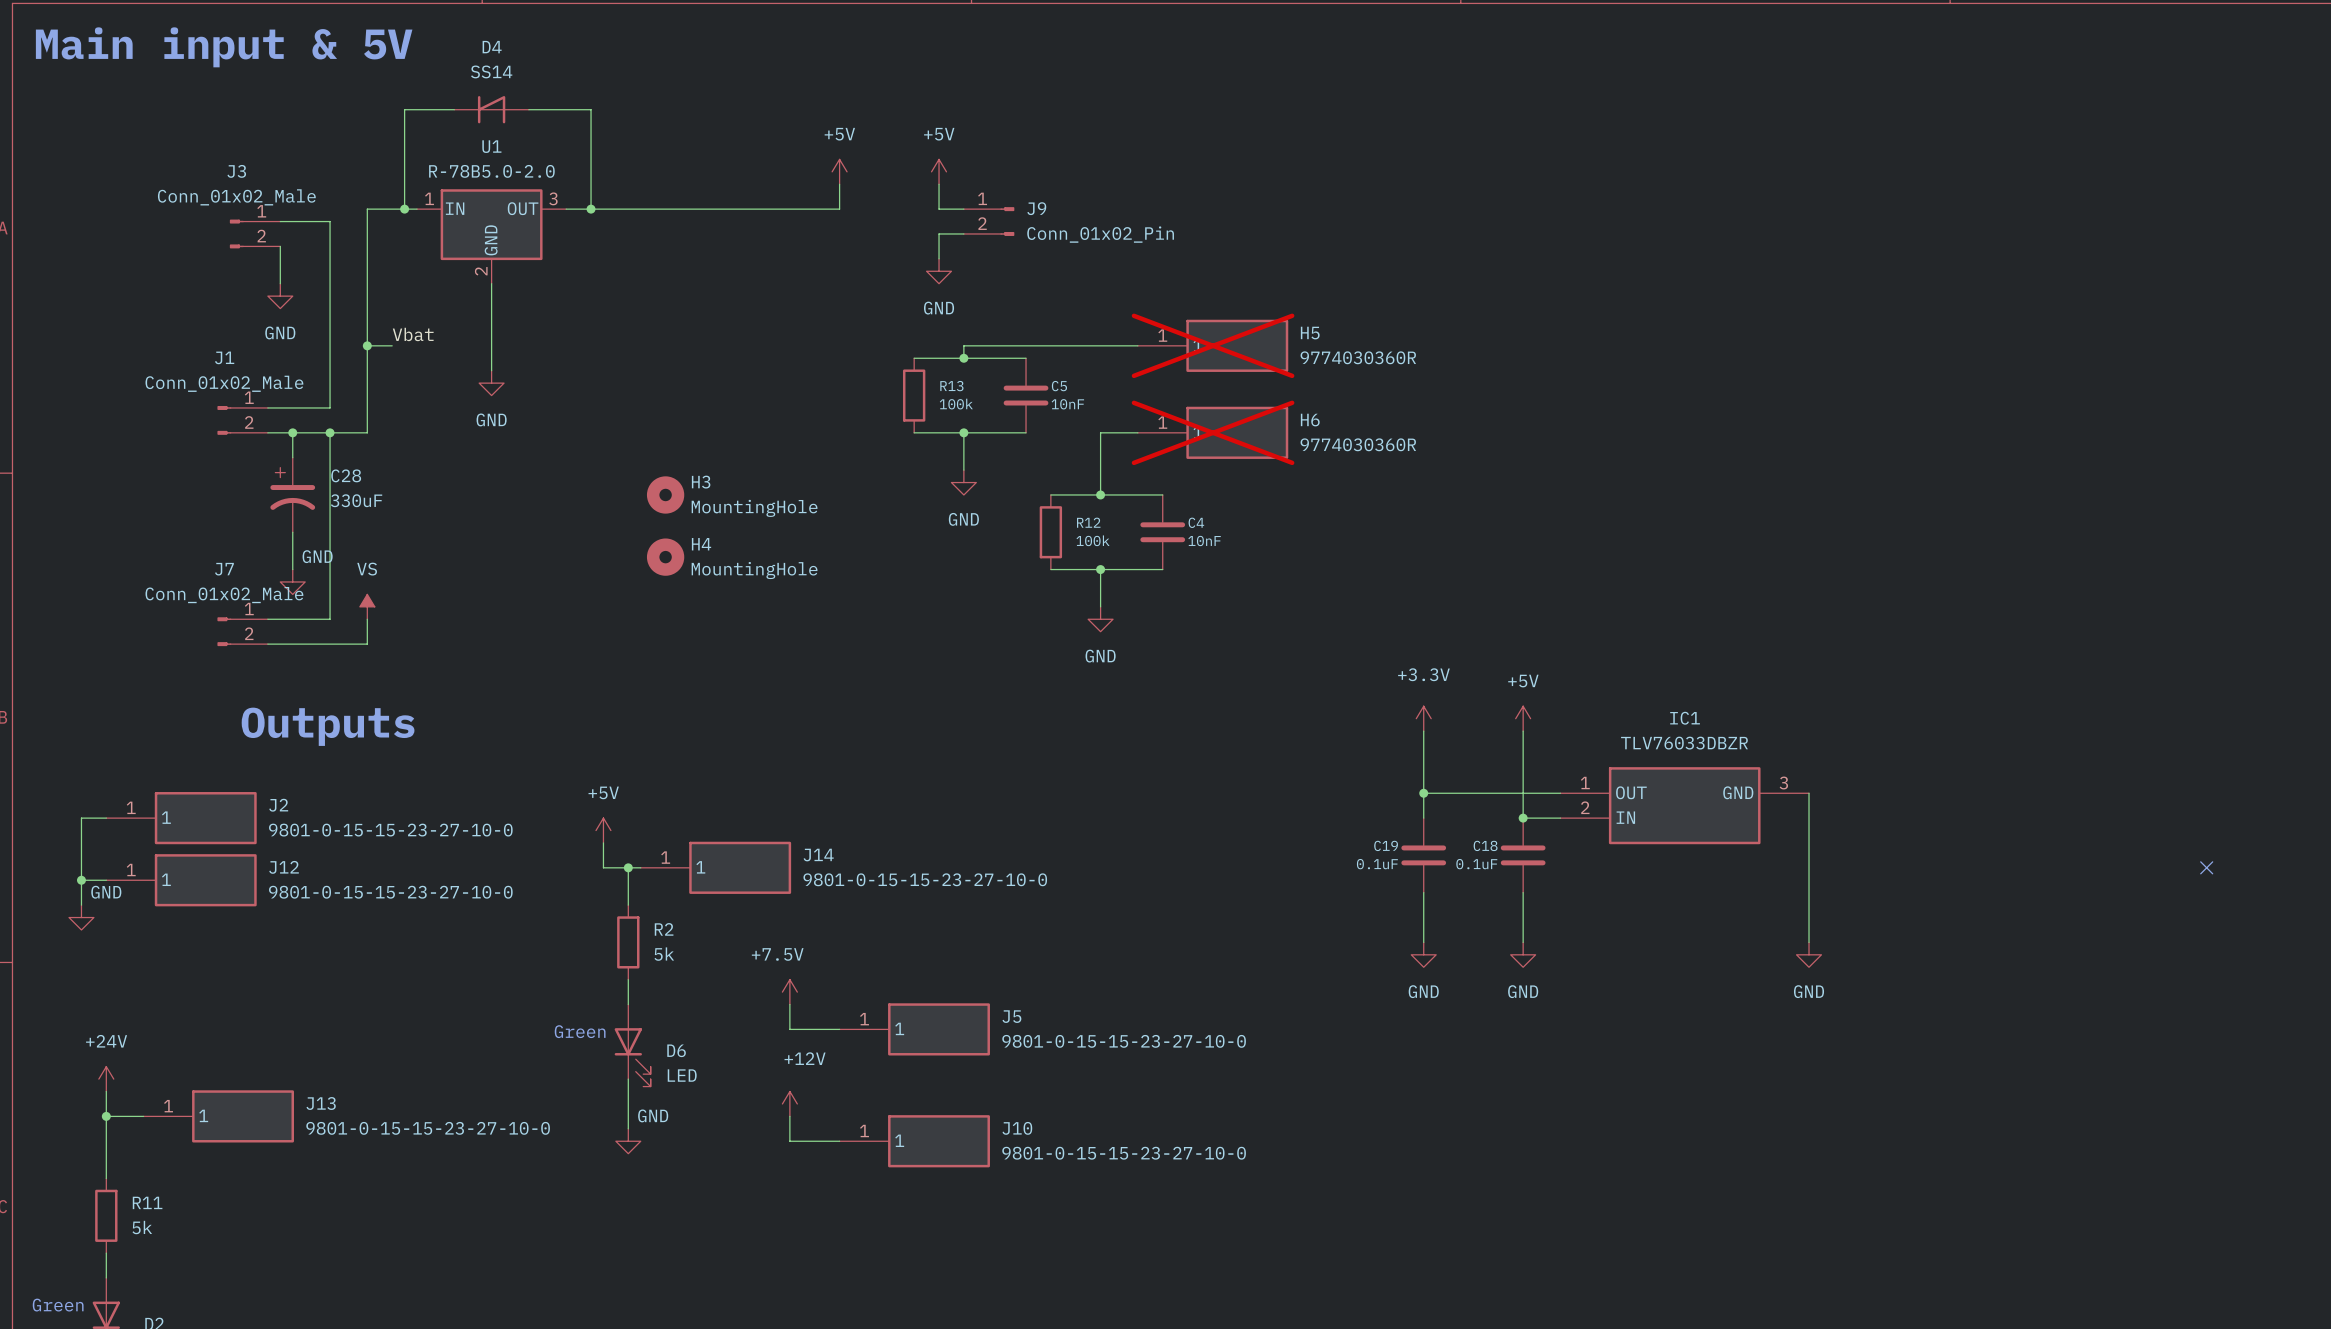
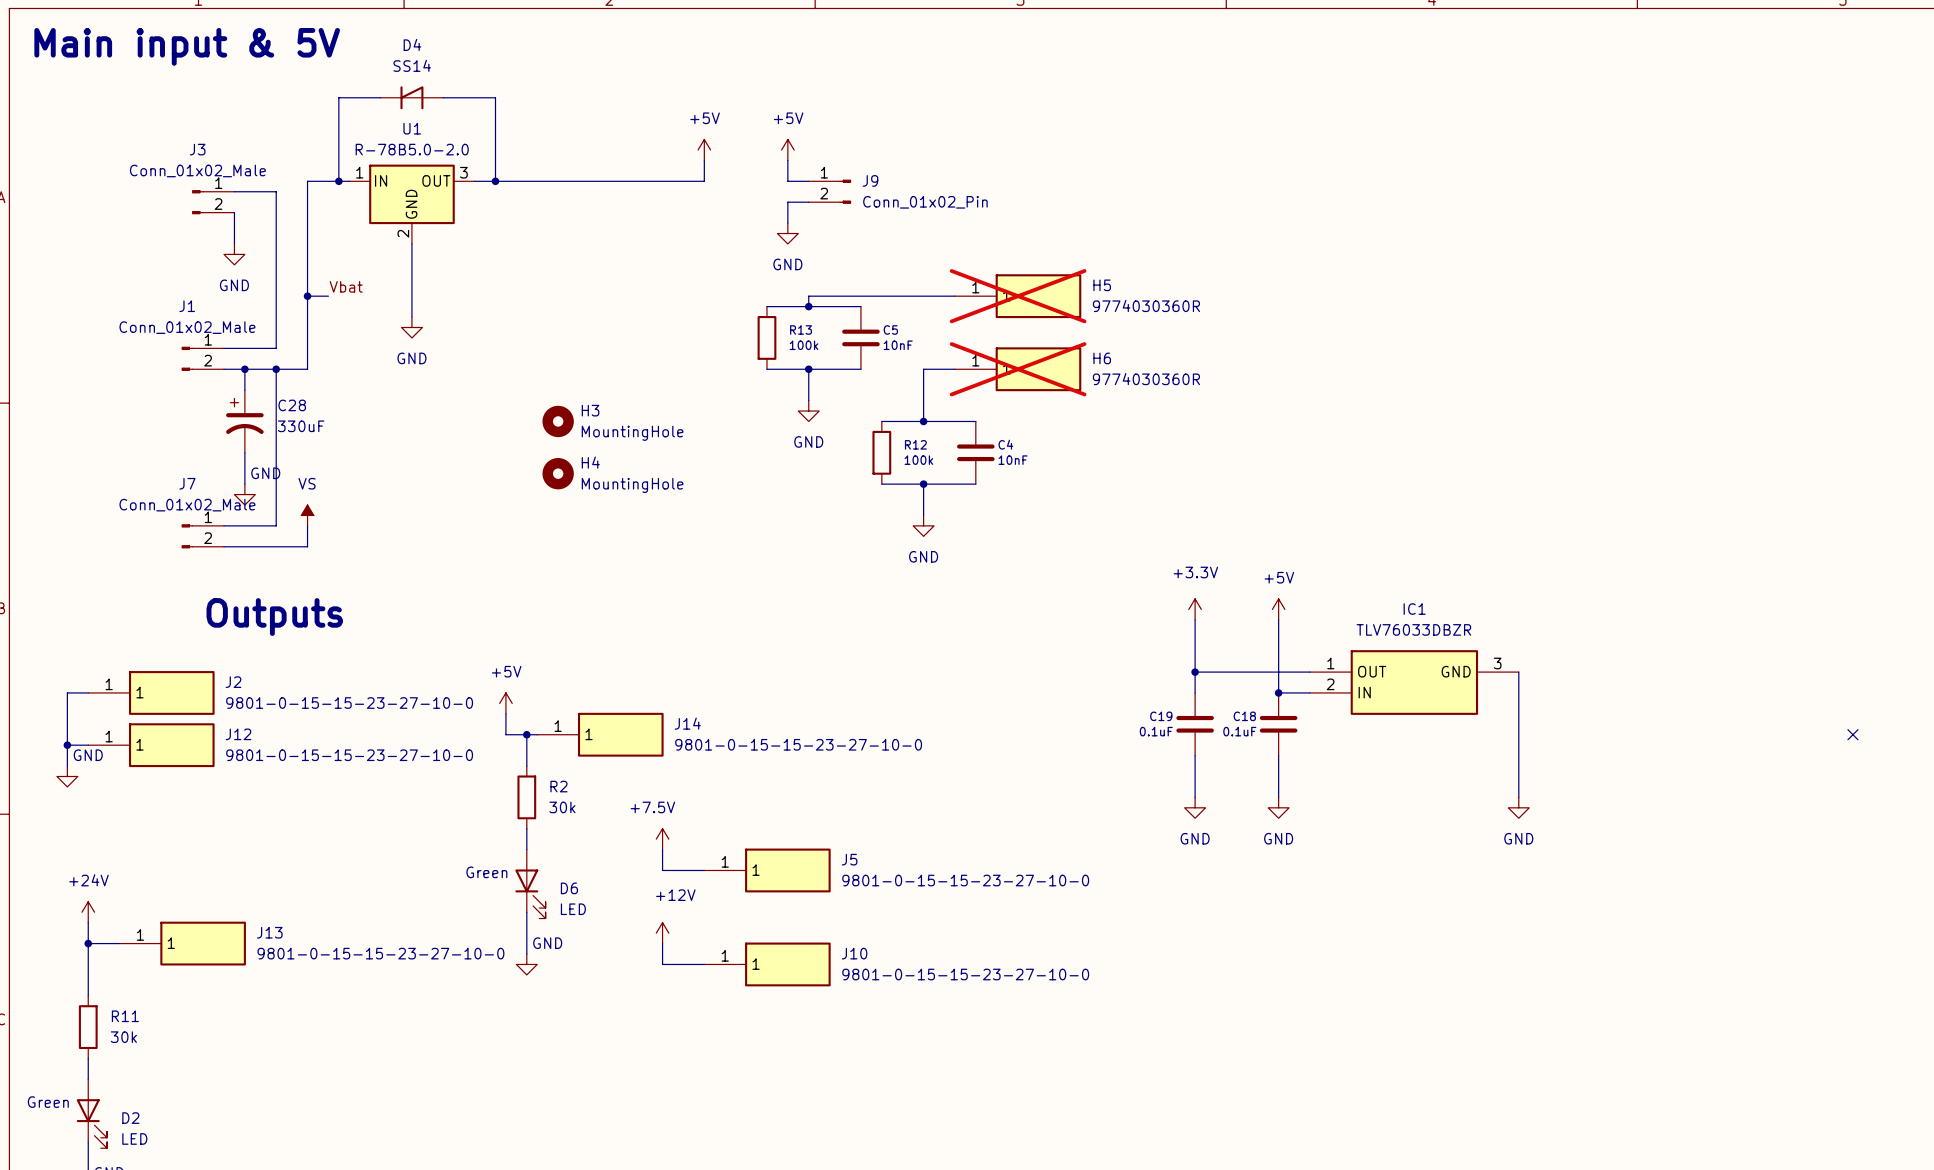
R2 value: 5k (664, 954) -> 30k (562, 807)
R11 value: 5k (142, 1227) -> 30k (123, 1037)

